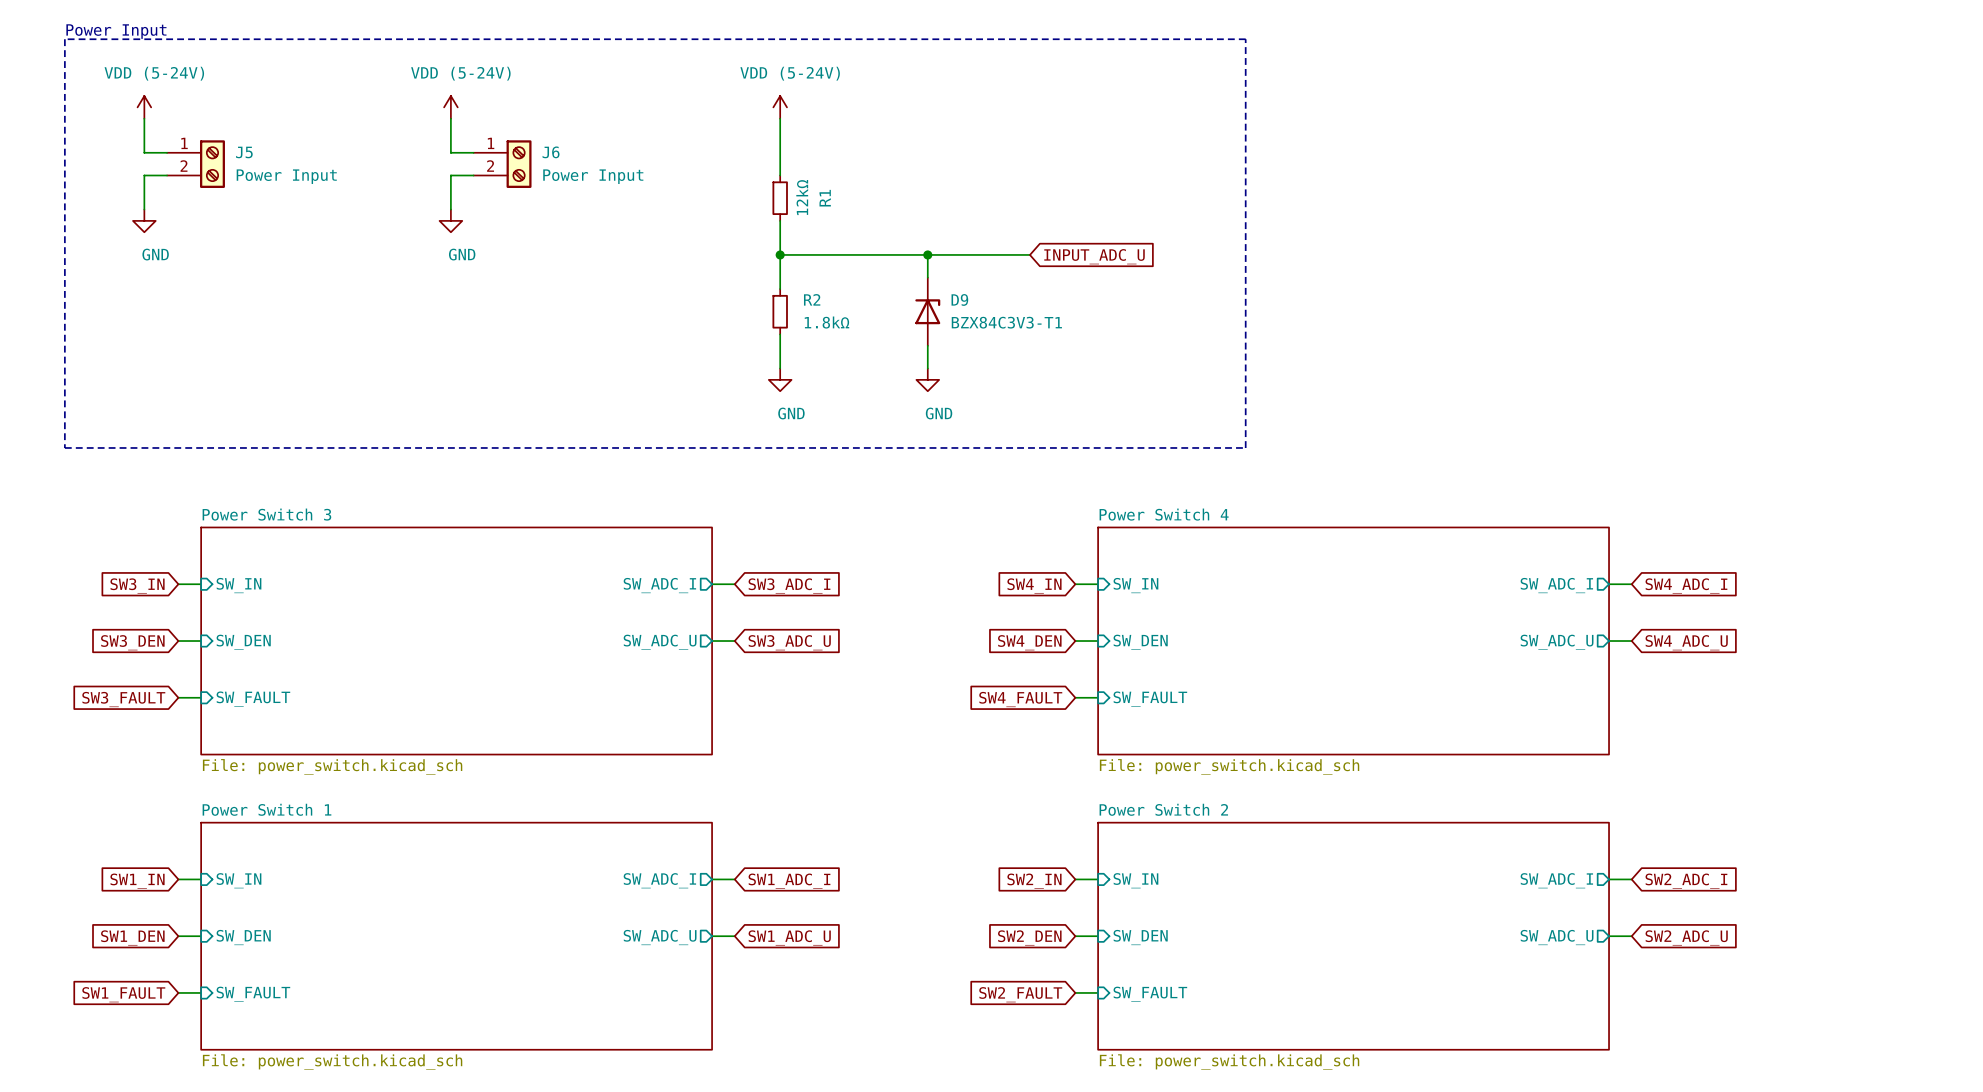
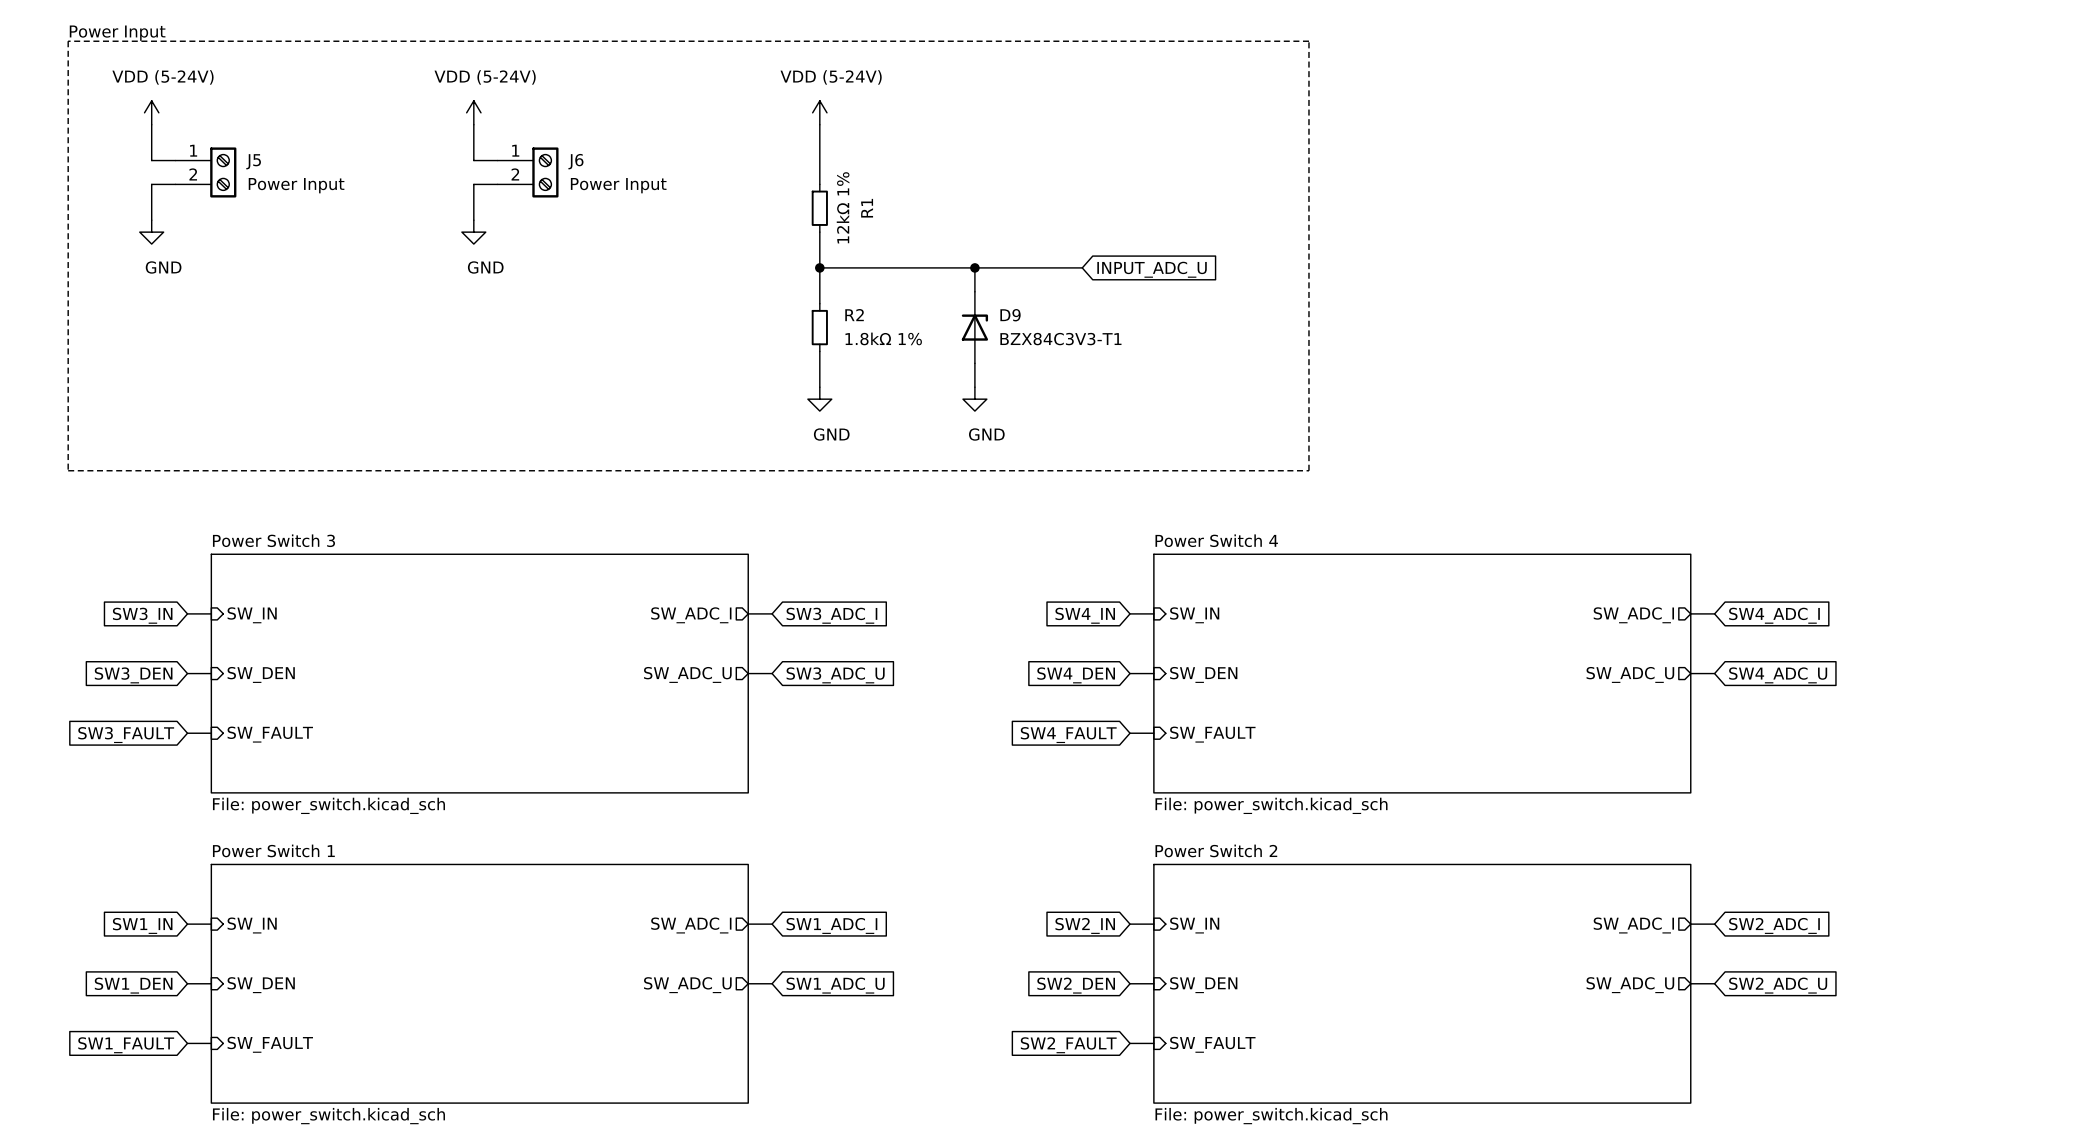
R1 value: 12kΩ (802, 197) -> 12kΩ 1% (843, 207)
R2 value: 1.8kΩ (826, 322) -> 1.8kΩ 1% (883, 338)

